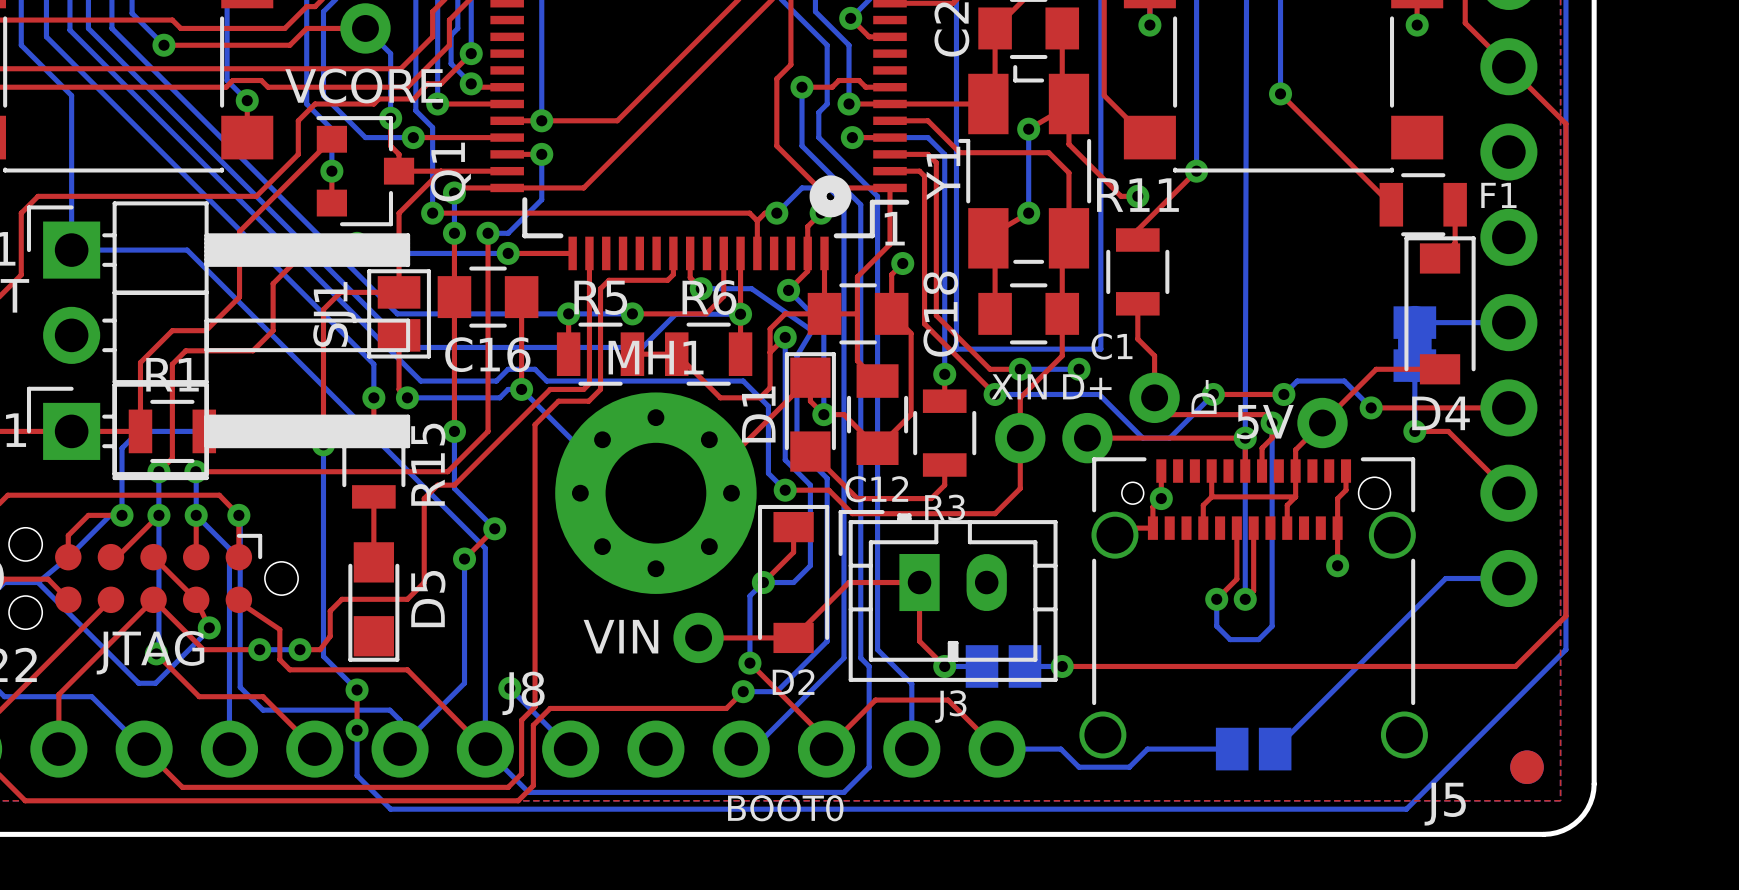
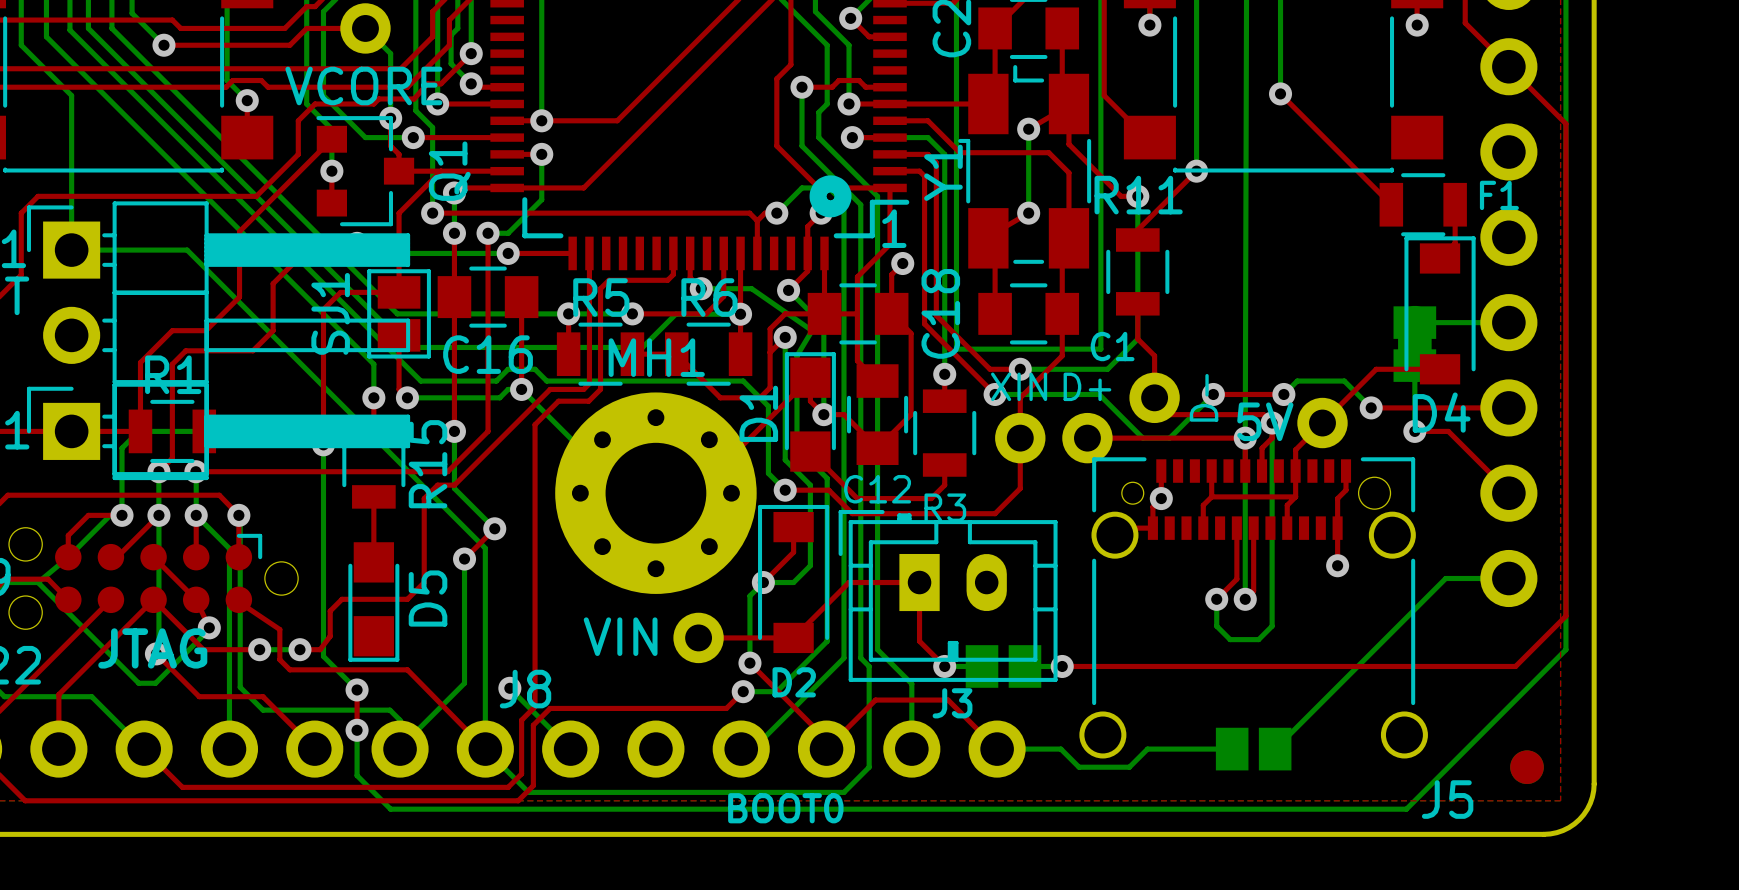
bottom track: none -> (1137, 196) (1137, 339) (1107, 369) (1079, 369)
via: (1079, 369) -> none

